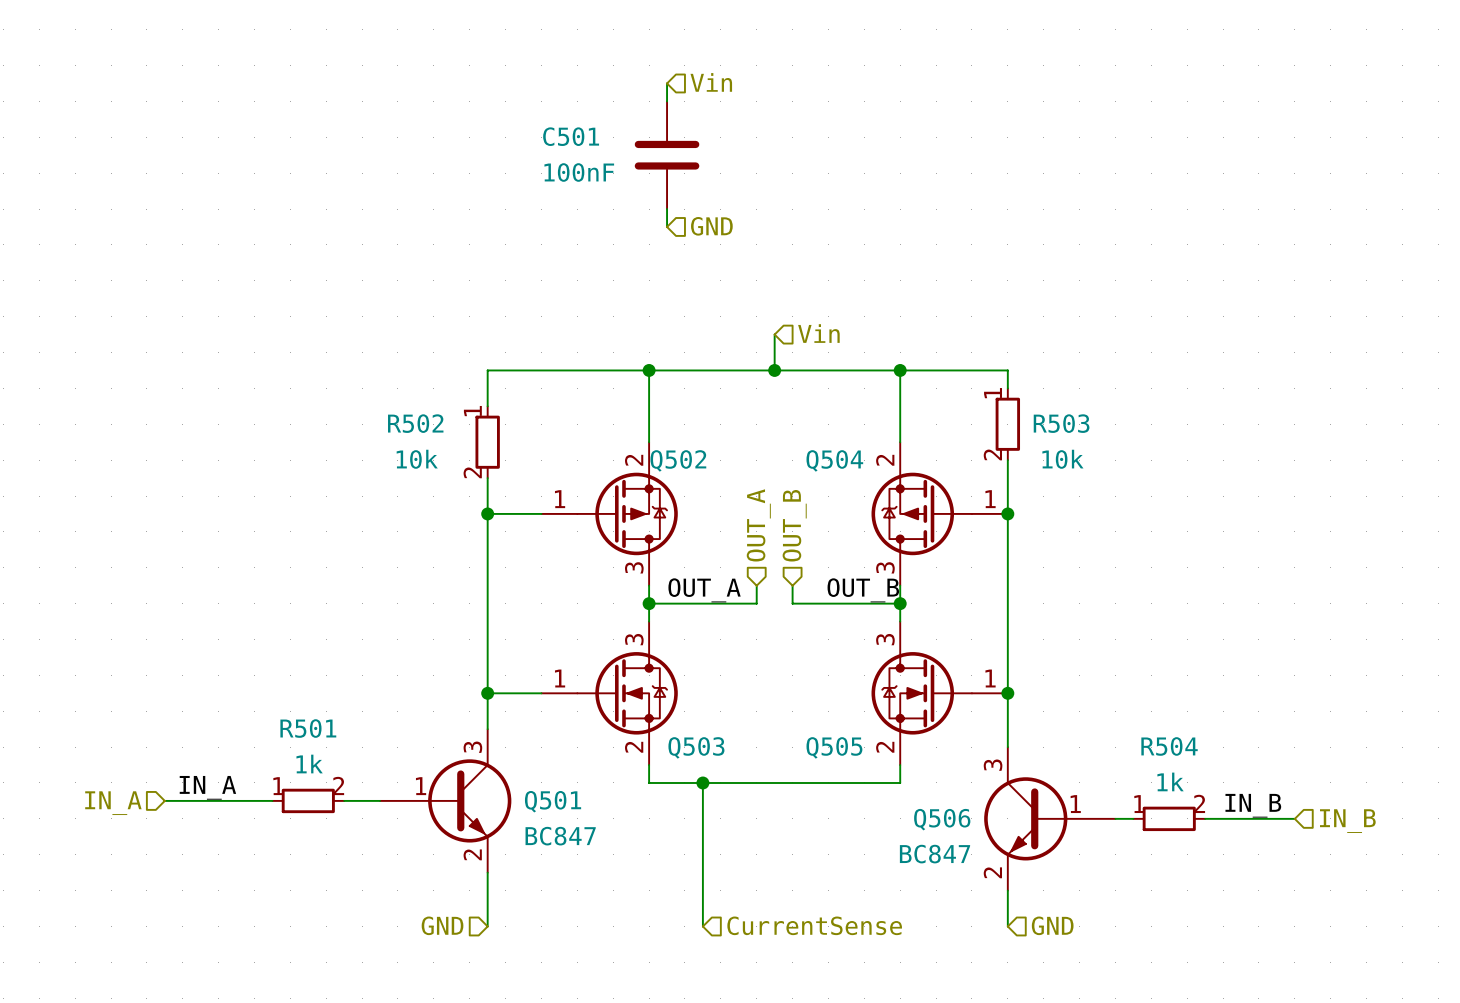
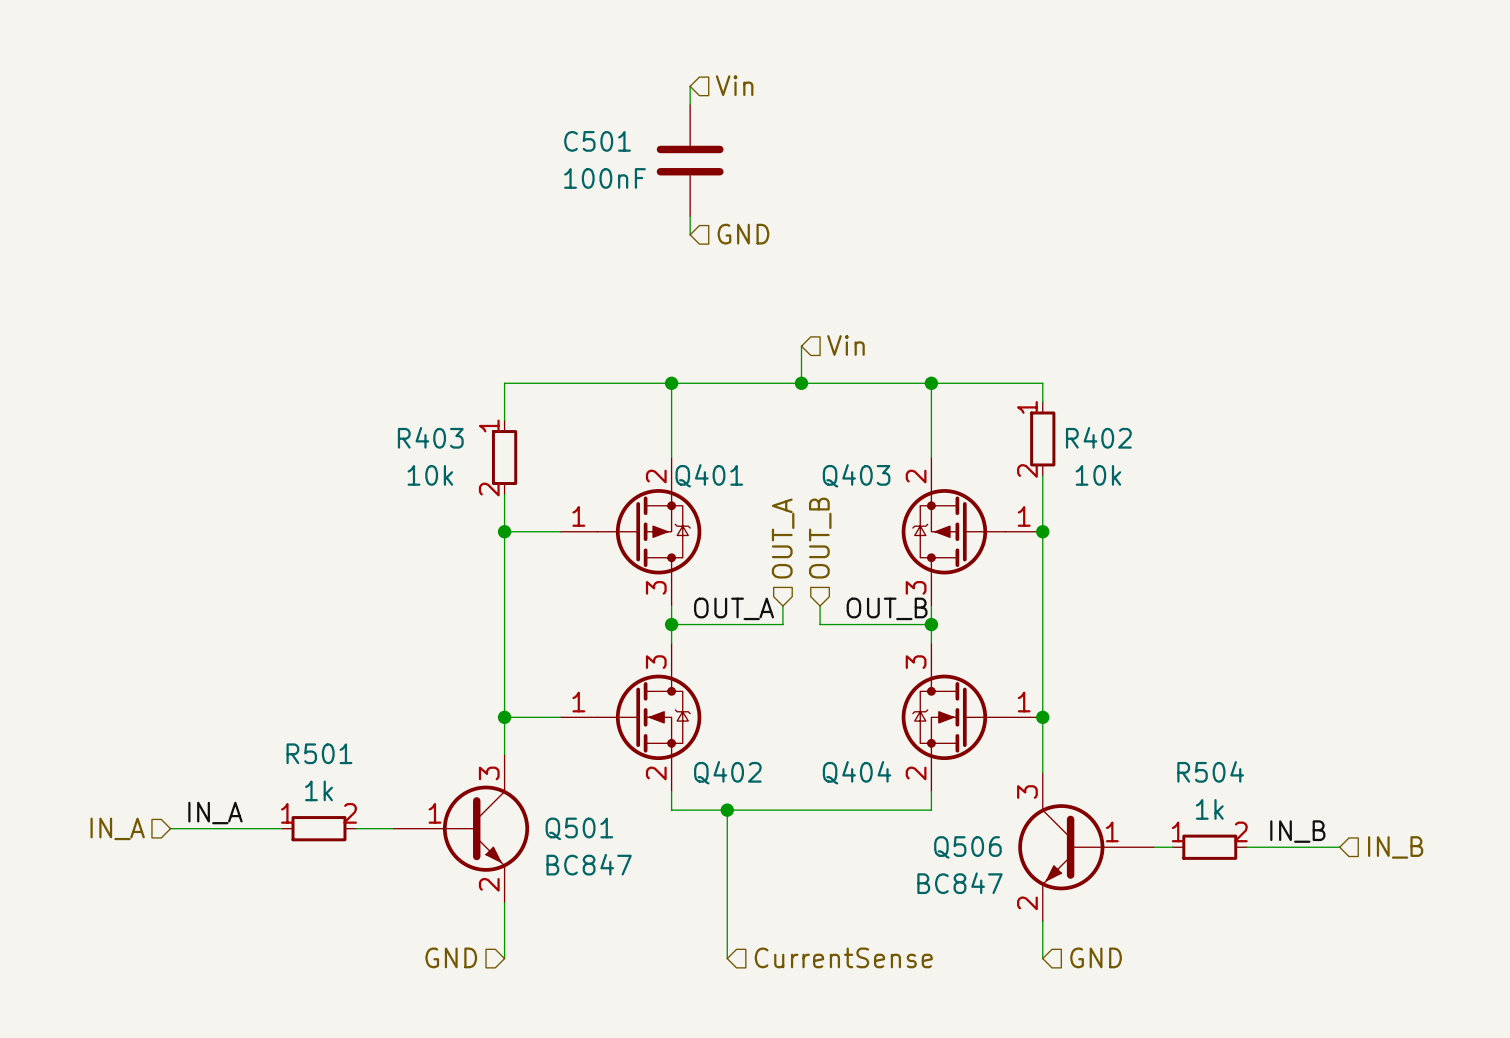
R502 name: R502 (415, 423) -> R403 (430, 437)
R503 name: R503 (1061, 423) -> R402 (1098, 437)
Q502 name: Q502 (678, 460) -> Q401 (709, 475)
Q504 name: Q504 (834, 460) -> Q403 (856, 475)
Q503 name: Q503 (696, 747) -> Q402 (727, 772)
Q505 name: Q505 (834, 747) -> Q404 (857, 772)

